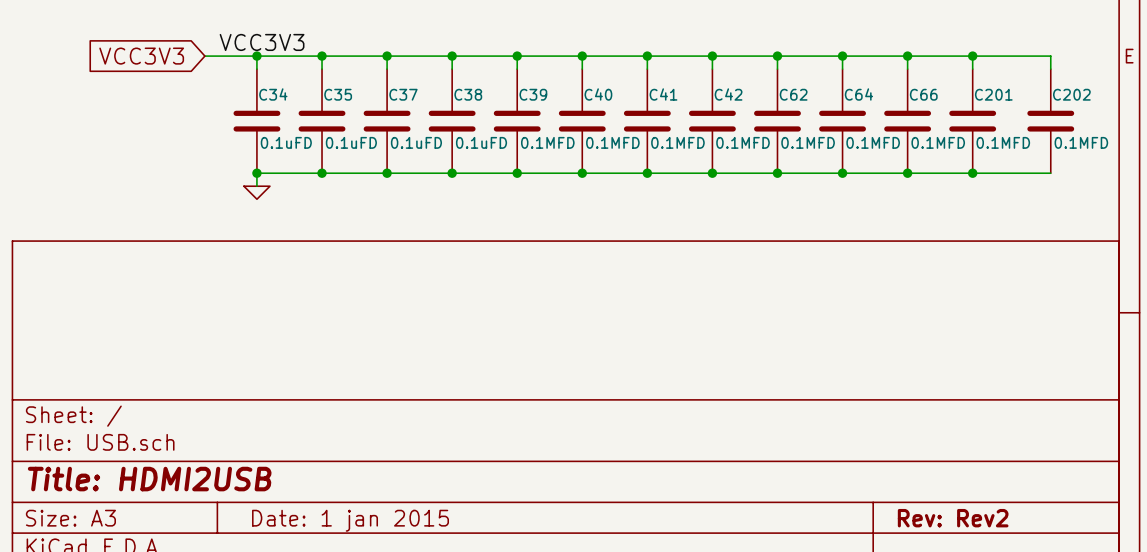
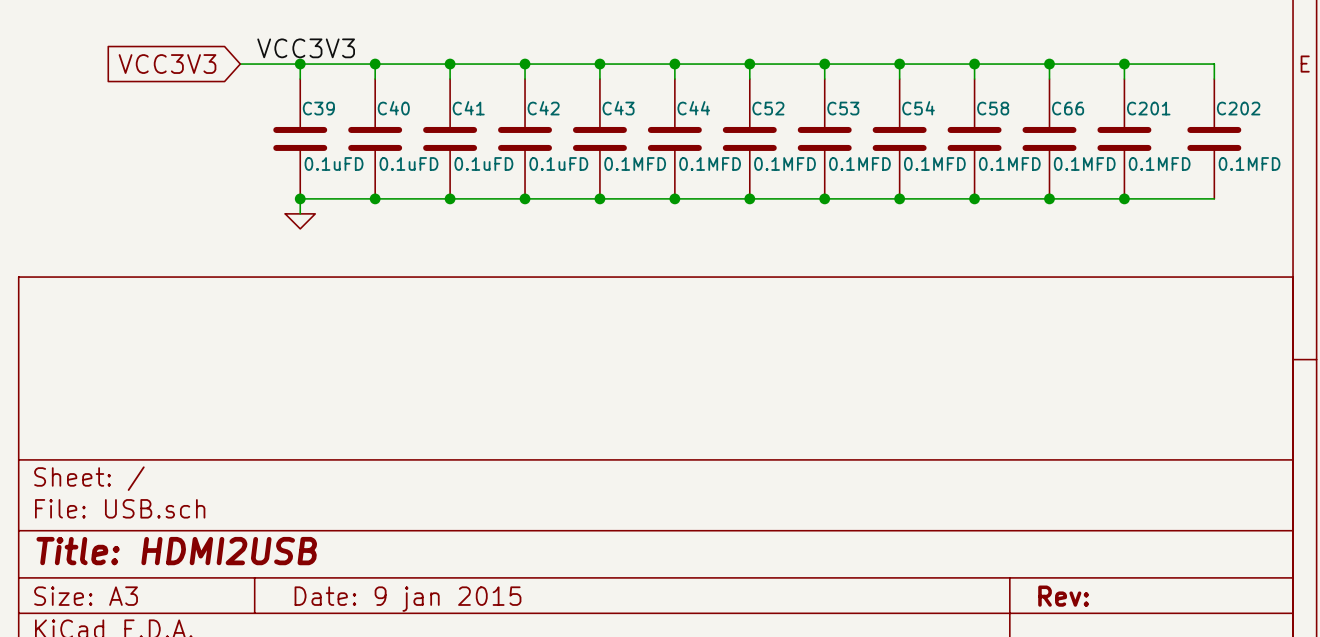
C34 name: C34 (273, 94) -> C39 (318, 108)
C35 name: C35 (338, 94) -> C40 (393, 108)
C37 name: C37 (403, 94) -> C41 (468, 108)
C38 name: C38 (468, 94) -> C42 (543, 108)
C39 name: C39 (533, 94) -> C43 (618, 108)
C40 name: C40 (598, 94) -> C44 (693, 108)
C41 name: C41 (663, 94) -> C52 (768, 108)
C42 name: C42 (728, 94) -> C53 (843, 108)
C62 name: C62 (793, 94) -> C54 (918, 108)
C64 name: C64 (858, 94) -> C58 (993, 108)
title block: Rev: Rev2 (953, 518) -> Rev: (1063, 596)
title block: Date: 1 jan 2015 (350, 520) -> Date: 9 jan 2015 (407, 599)

